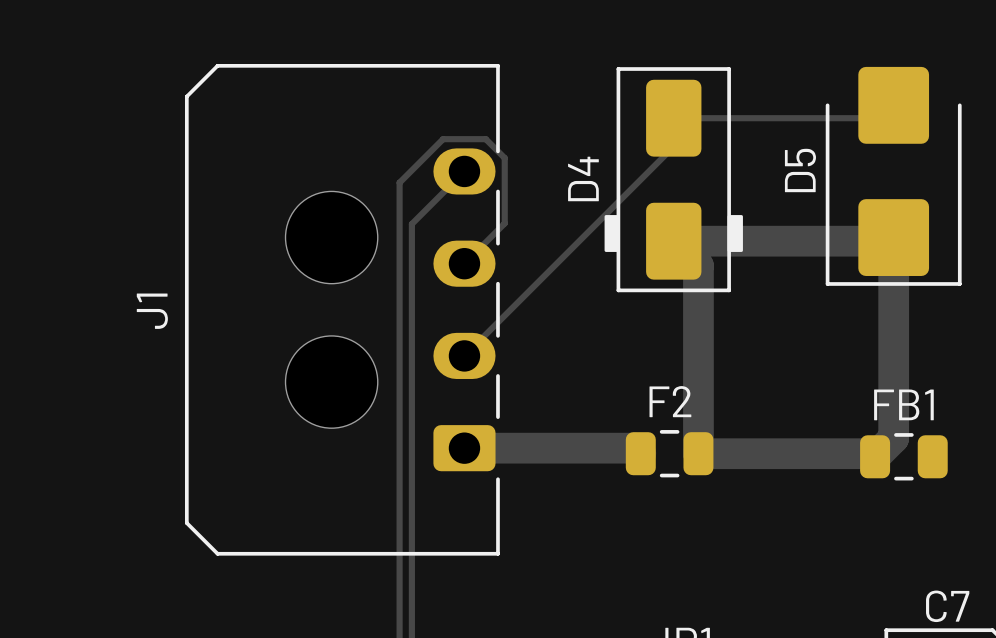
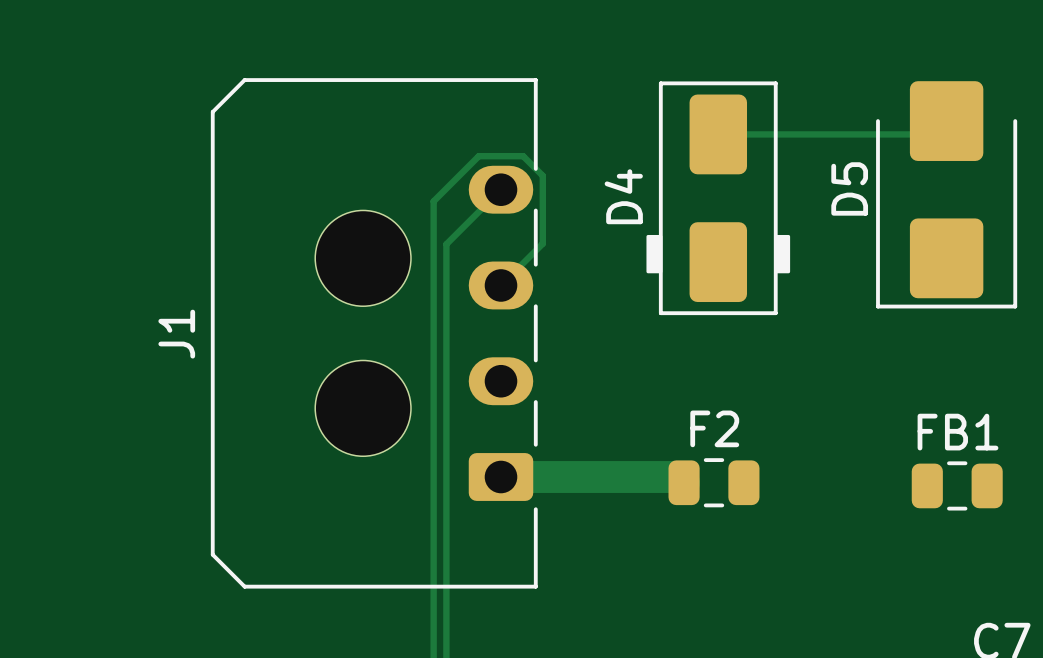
track: (673, 146) (464, 355) -> none
track: (893, 237) (893, 438) (875, 456) (872, 453) (698, 453) (698, 265) (673, 241) (890, 241) -> none

